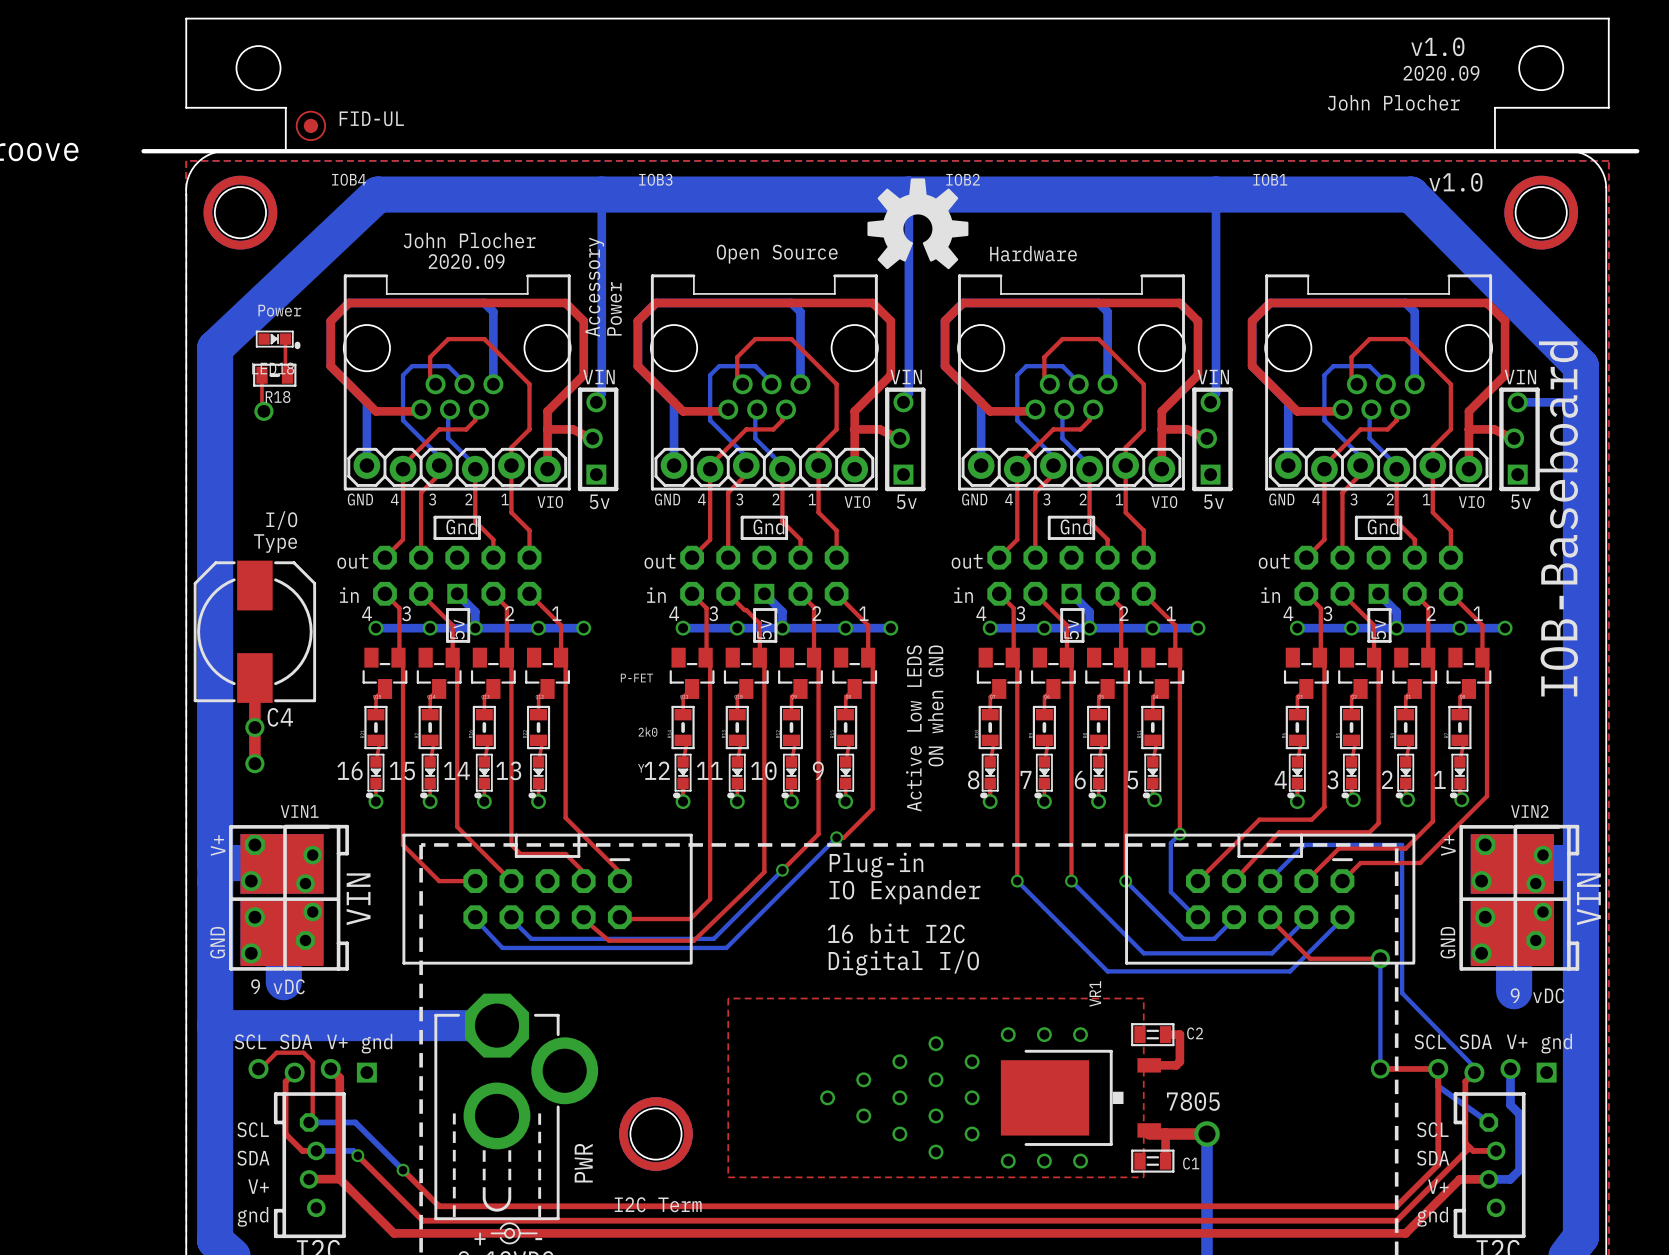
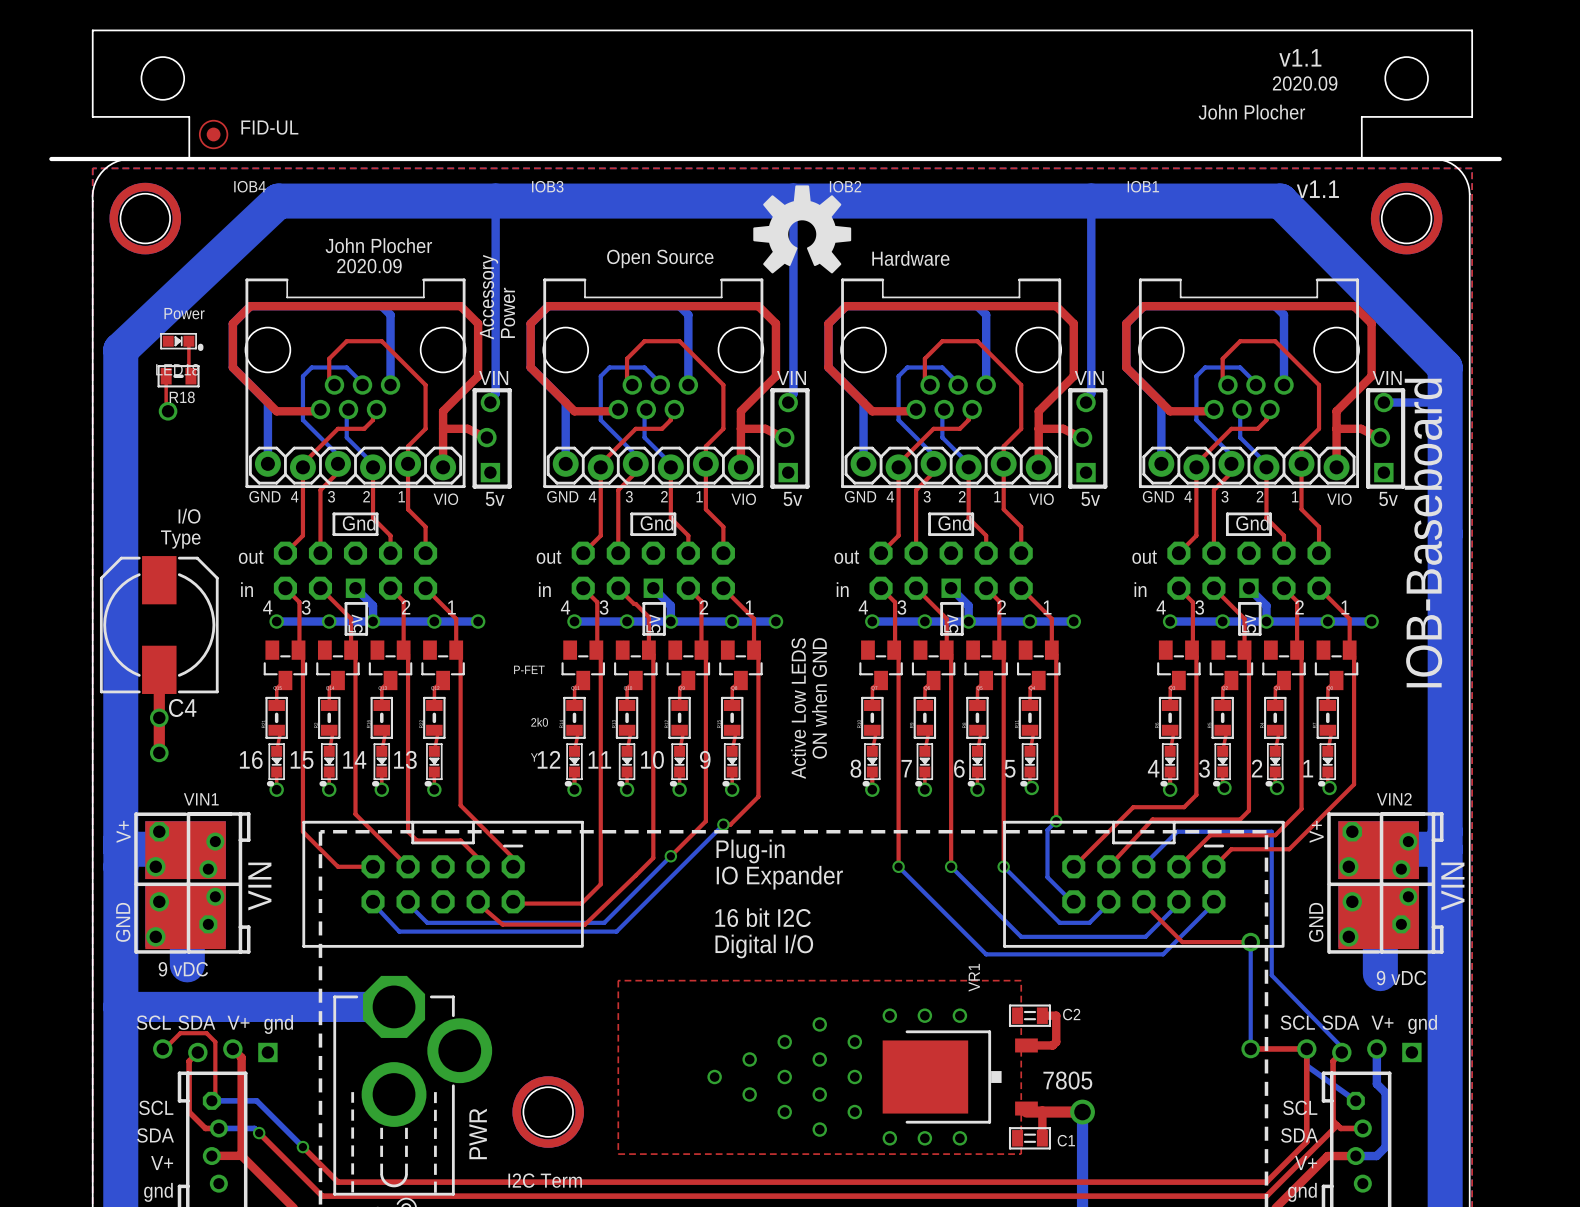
text: v1.0 (1437, 46) -> v1.1 (1300, 57)
text: v1.0 (1455, 182) -> v1.1 (1317, 189)

